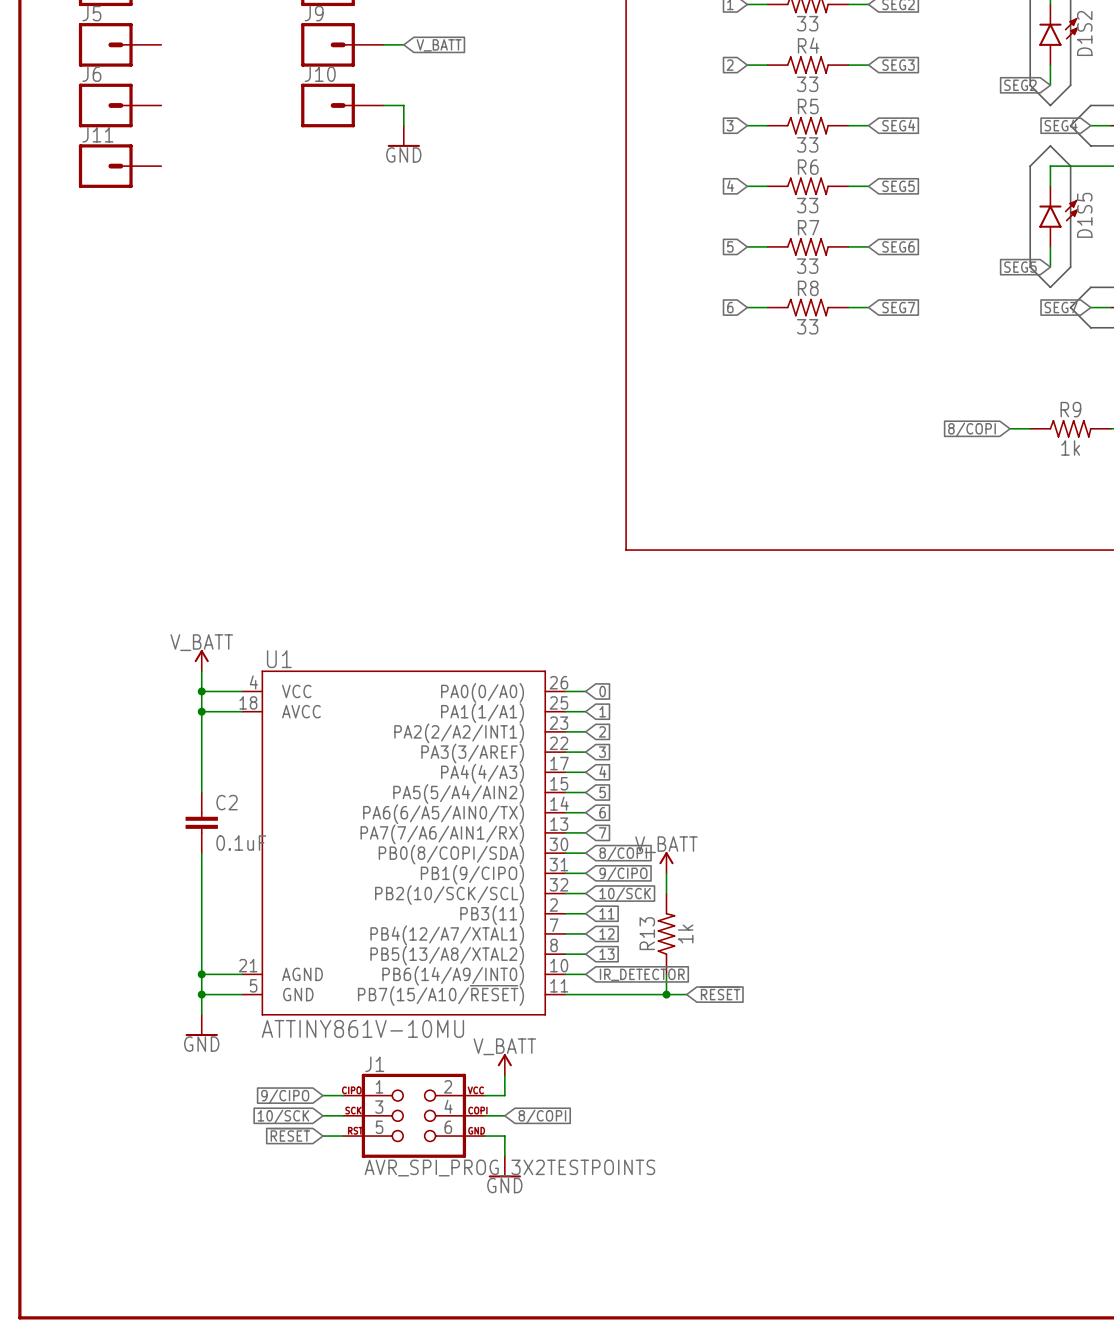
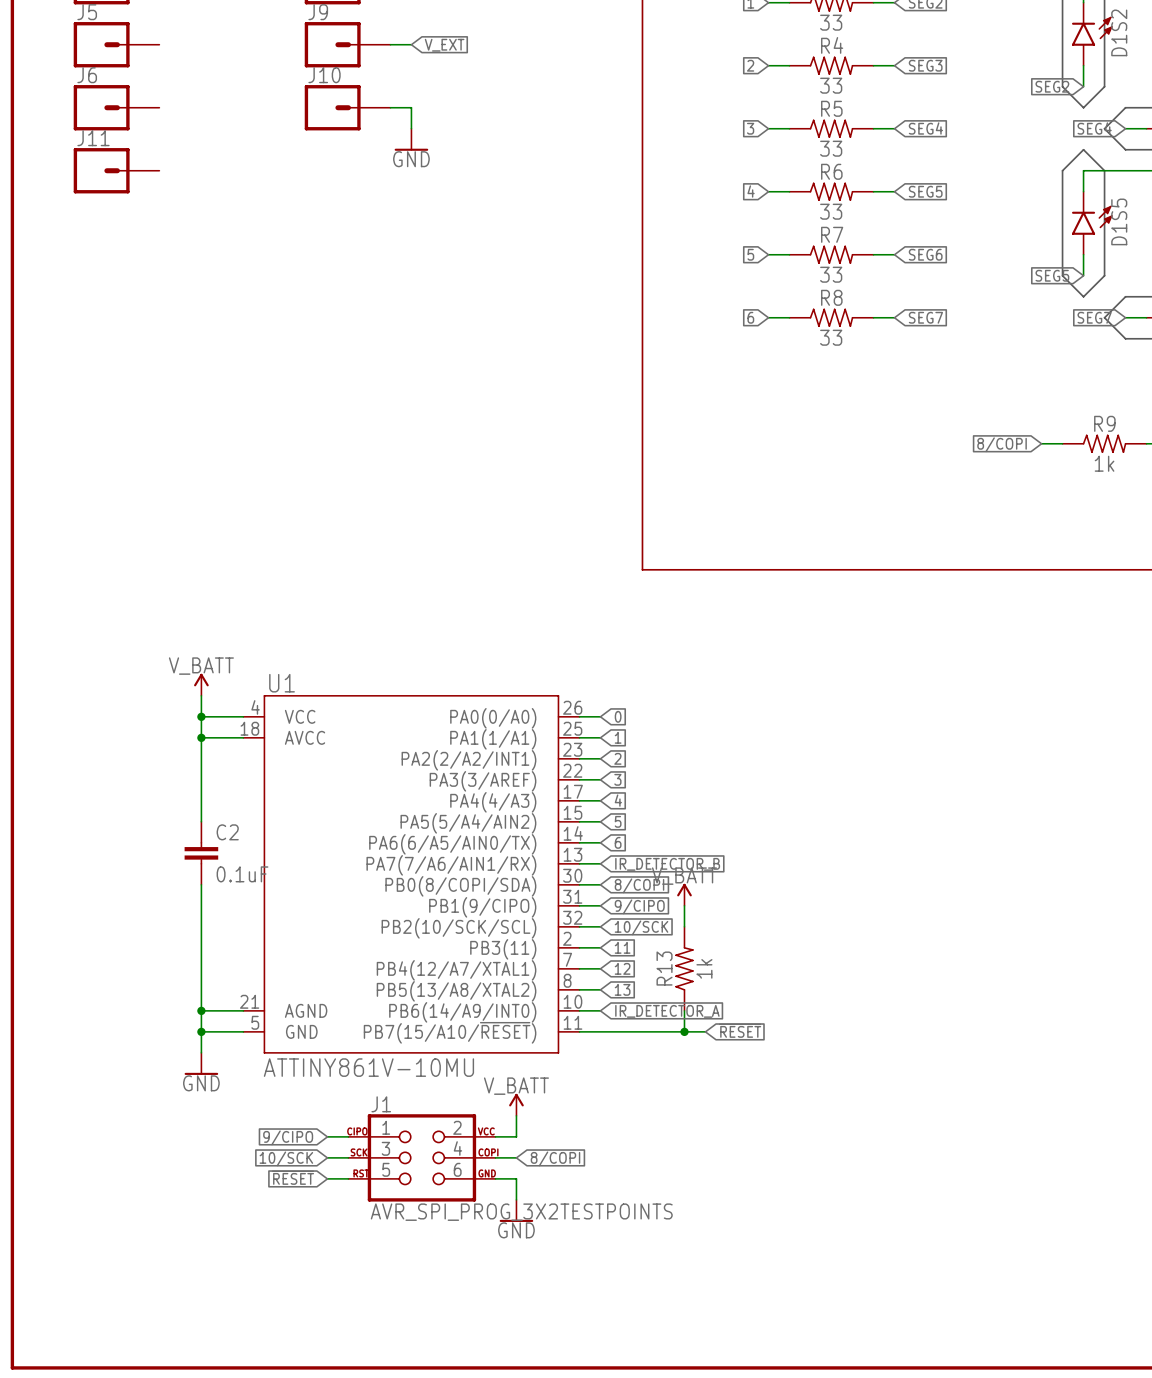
global label: V_BATT (439, 45) -> V_EXT (444, 45)
global label: 7 (602, 832) -> IR_DETECTOR_B (667, 864)
global label: IR_DETECTOR (642, 974) -> IR_DETECTOR_A (667, 1011)

